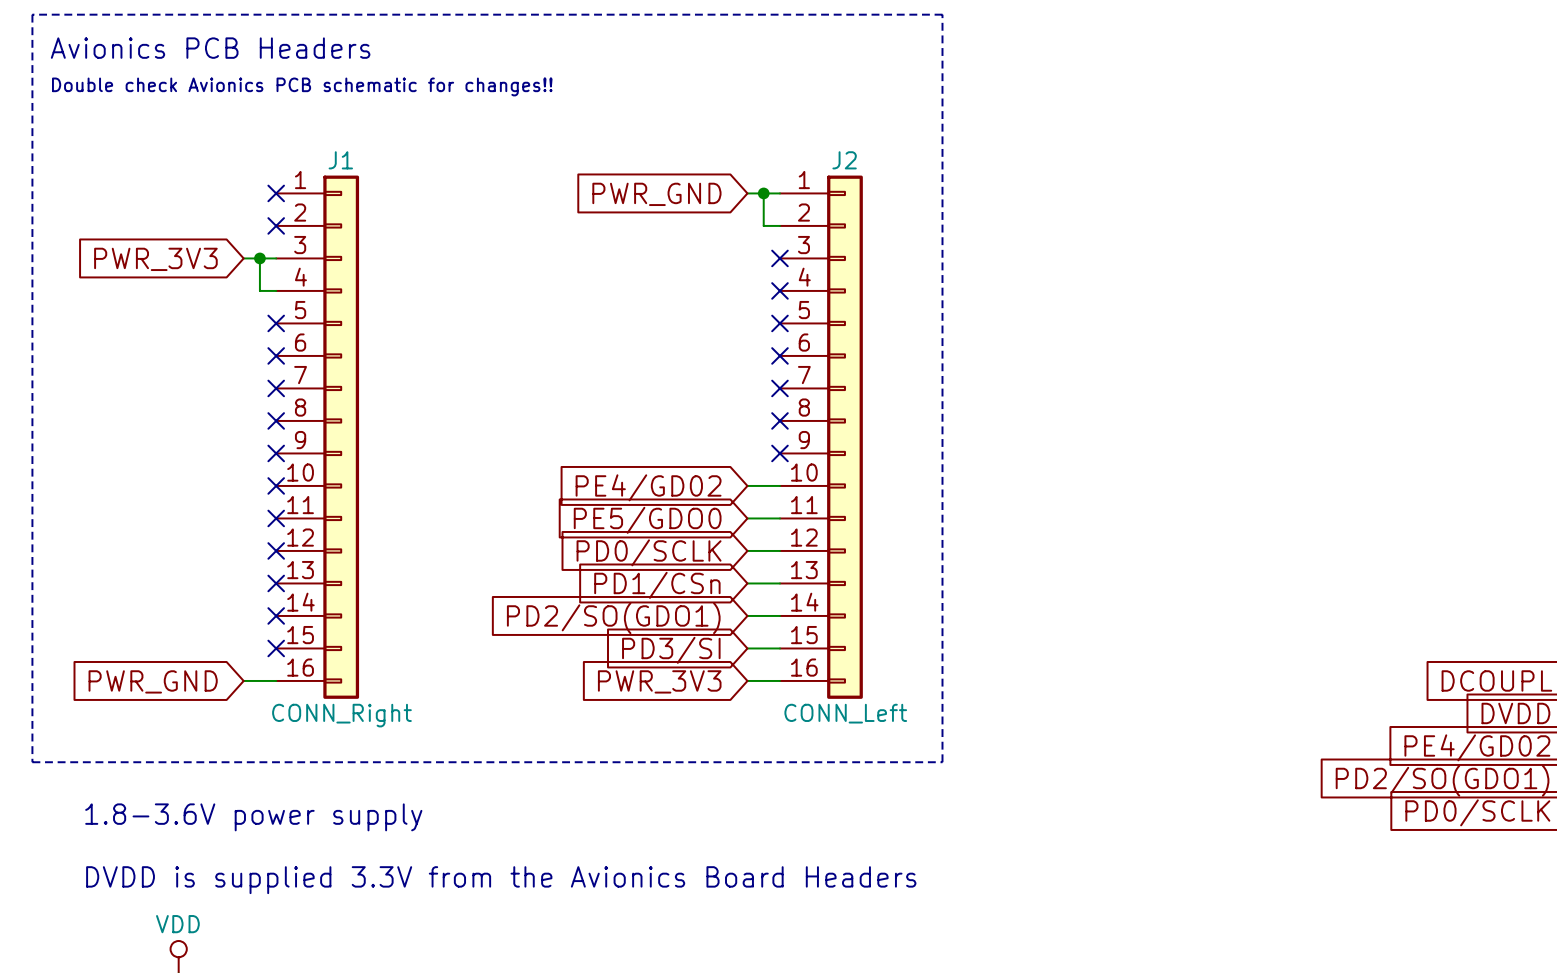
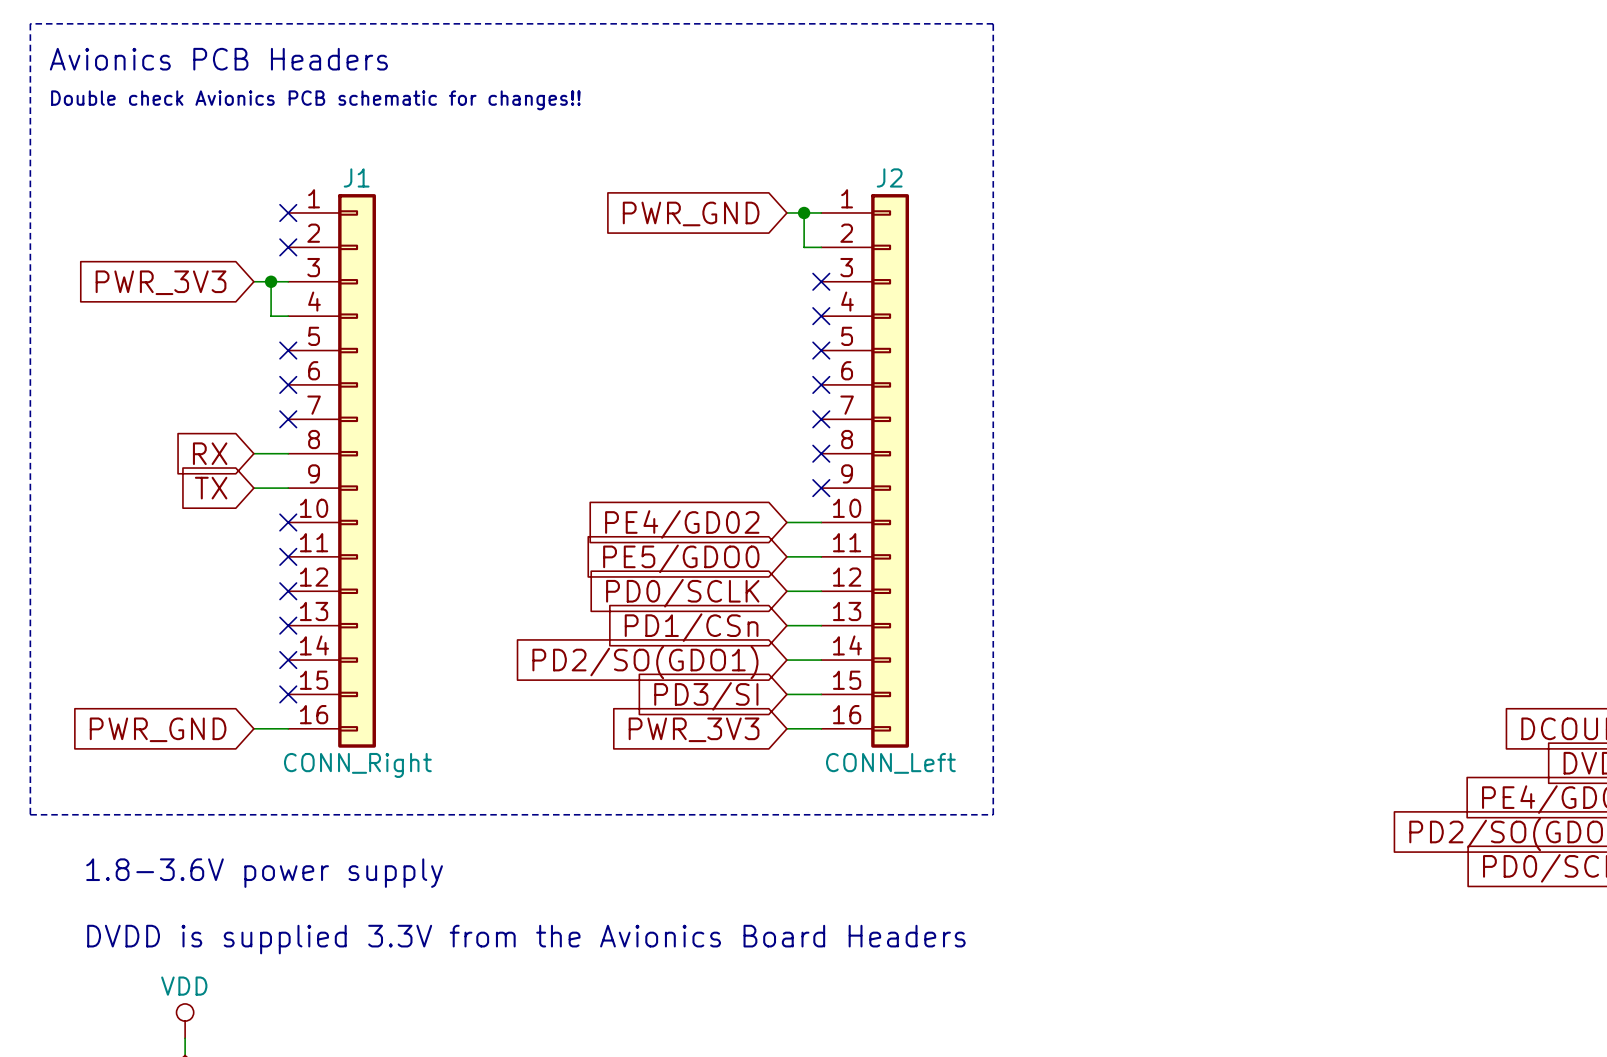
global label: none -> RX (210, 453)
wire: none -> (253, 453) (288, 453)
no-connect mark: (276, 420) -> none
global label: none -> TX (211, 488)
wire: none -> (253, 488) (288, 488)
no-connect mark: (276, 453) -> none

